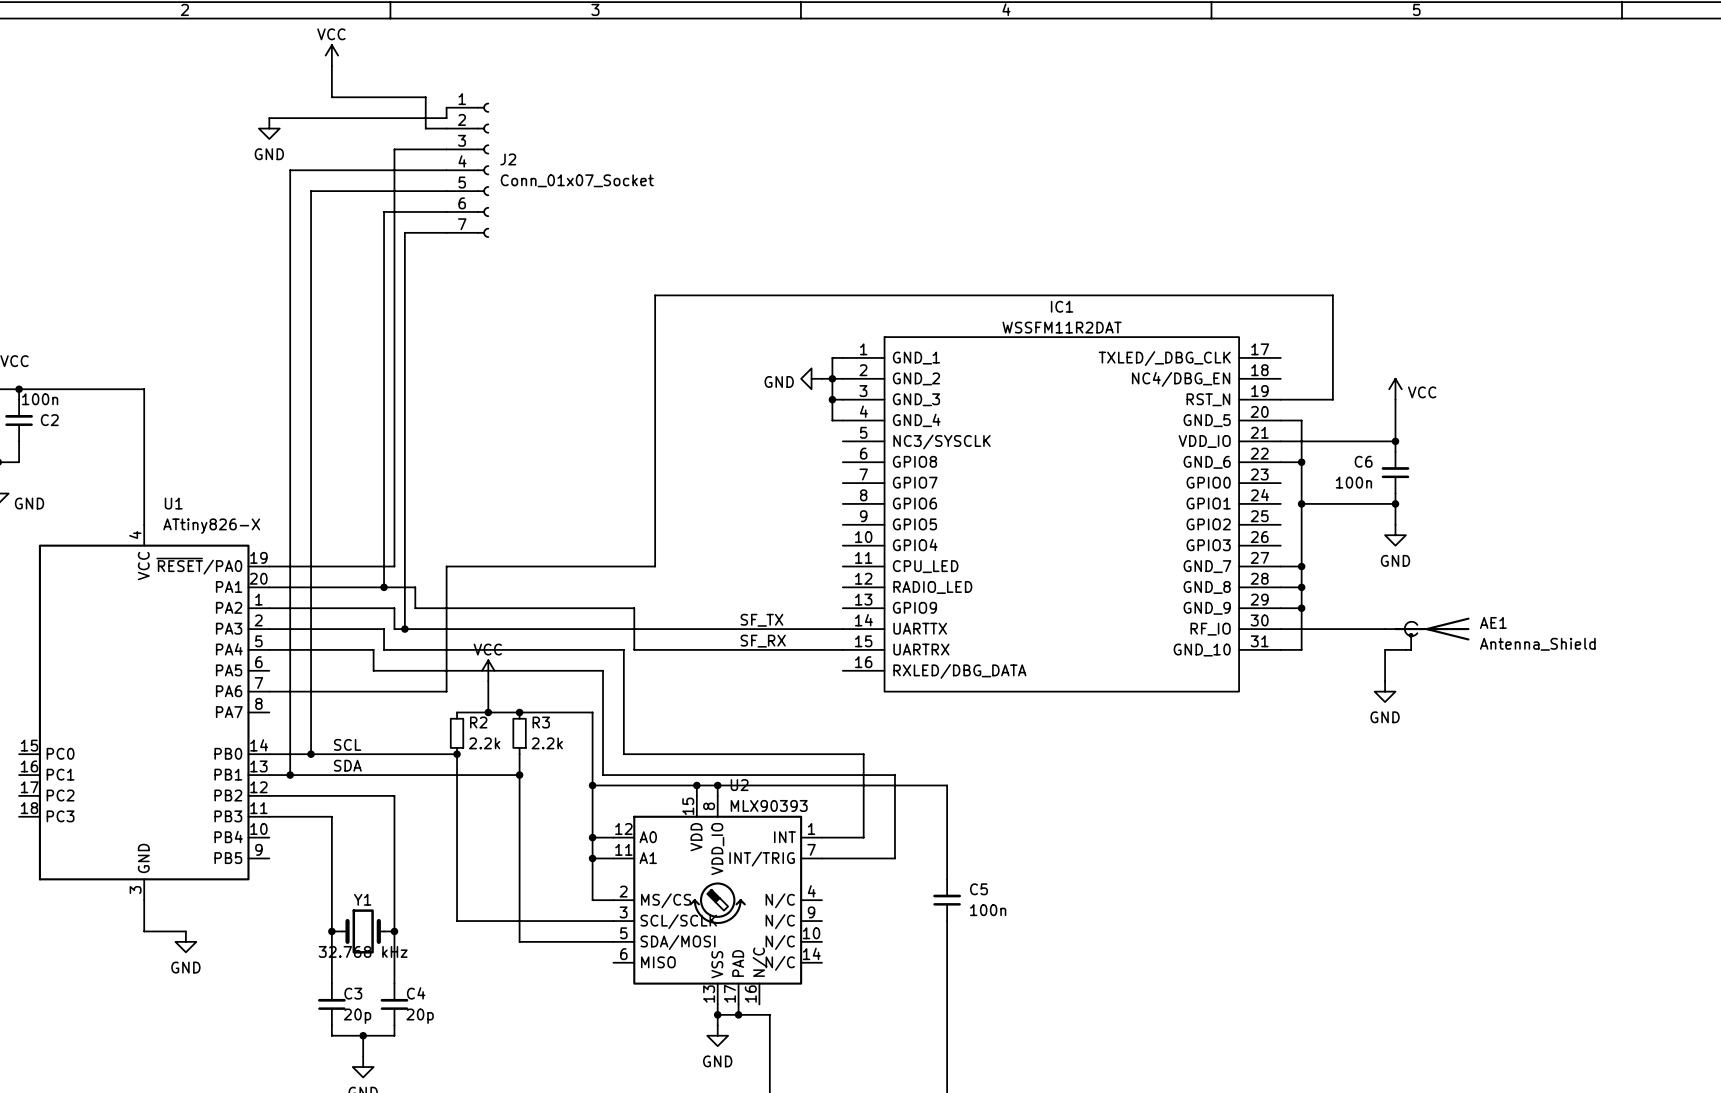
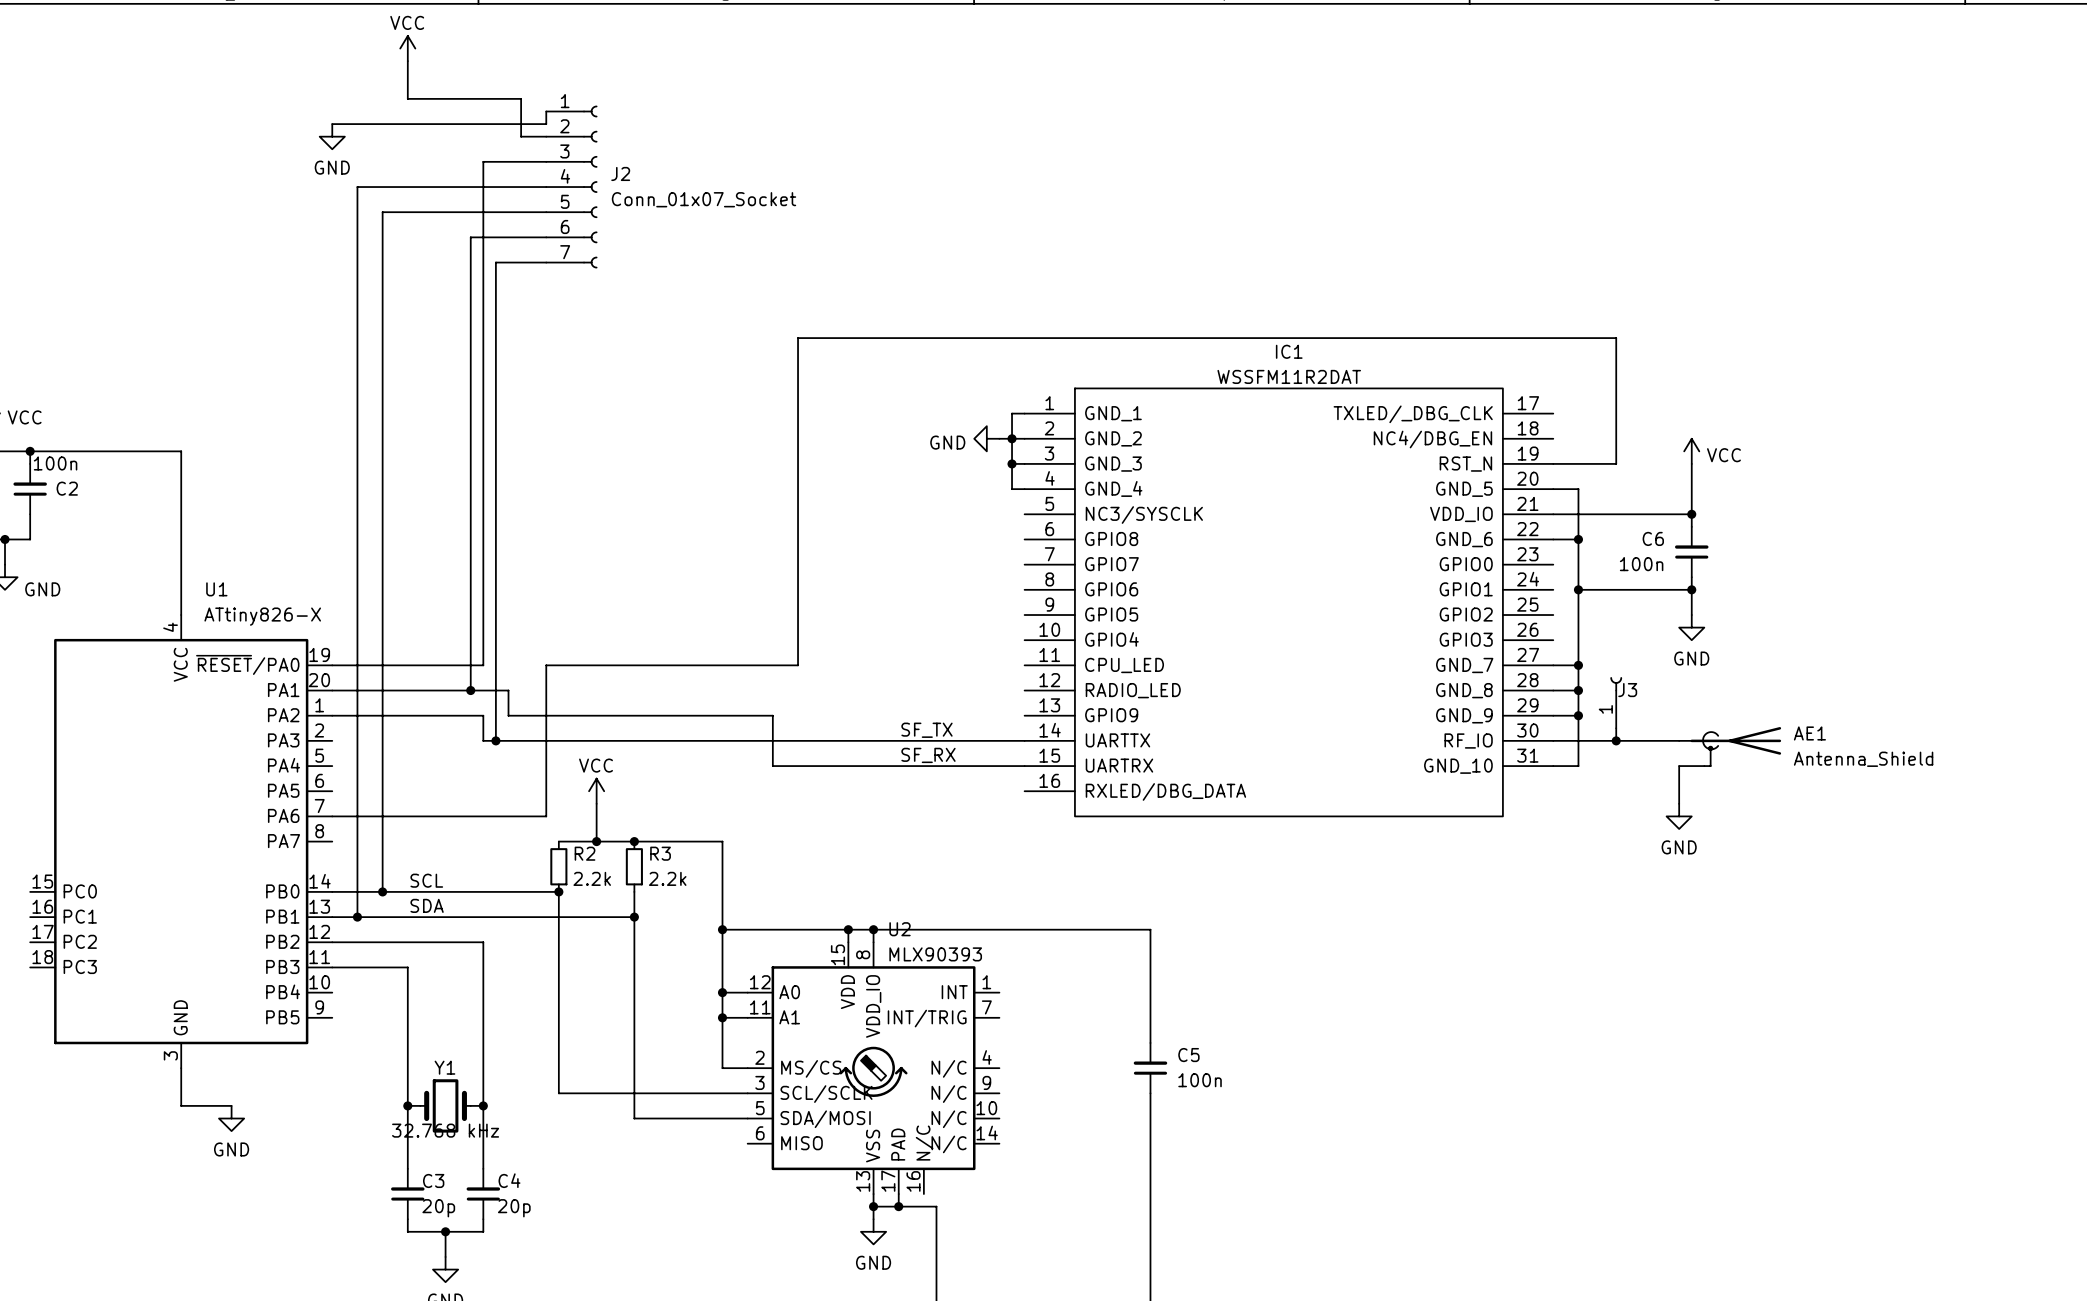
J3: none -> (1616, 702)
wire: none -> (1616, 728) (1616, 740)
wire: (269, 629) (384, 629) (384, 649) (623, 649) (623, 754) (863, 754) (863, 837) (821, 837) -> none
junction: none -> (1616, 740)
wire: (269, 649) (373, 649) (373, 670) (603, 670) (603, 775) (894, 775) (894, 858) (821, 858) -> none

